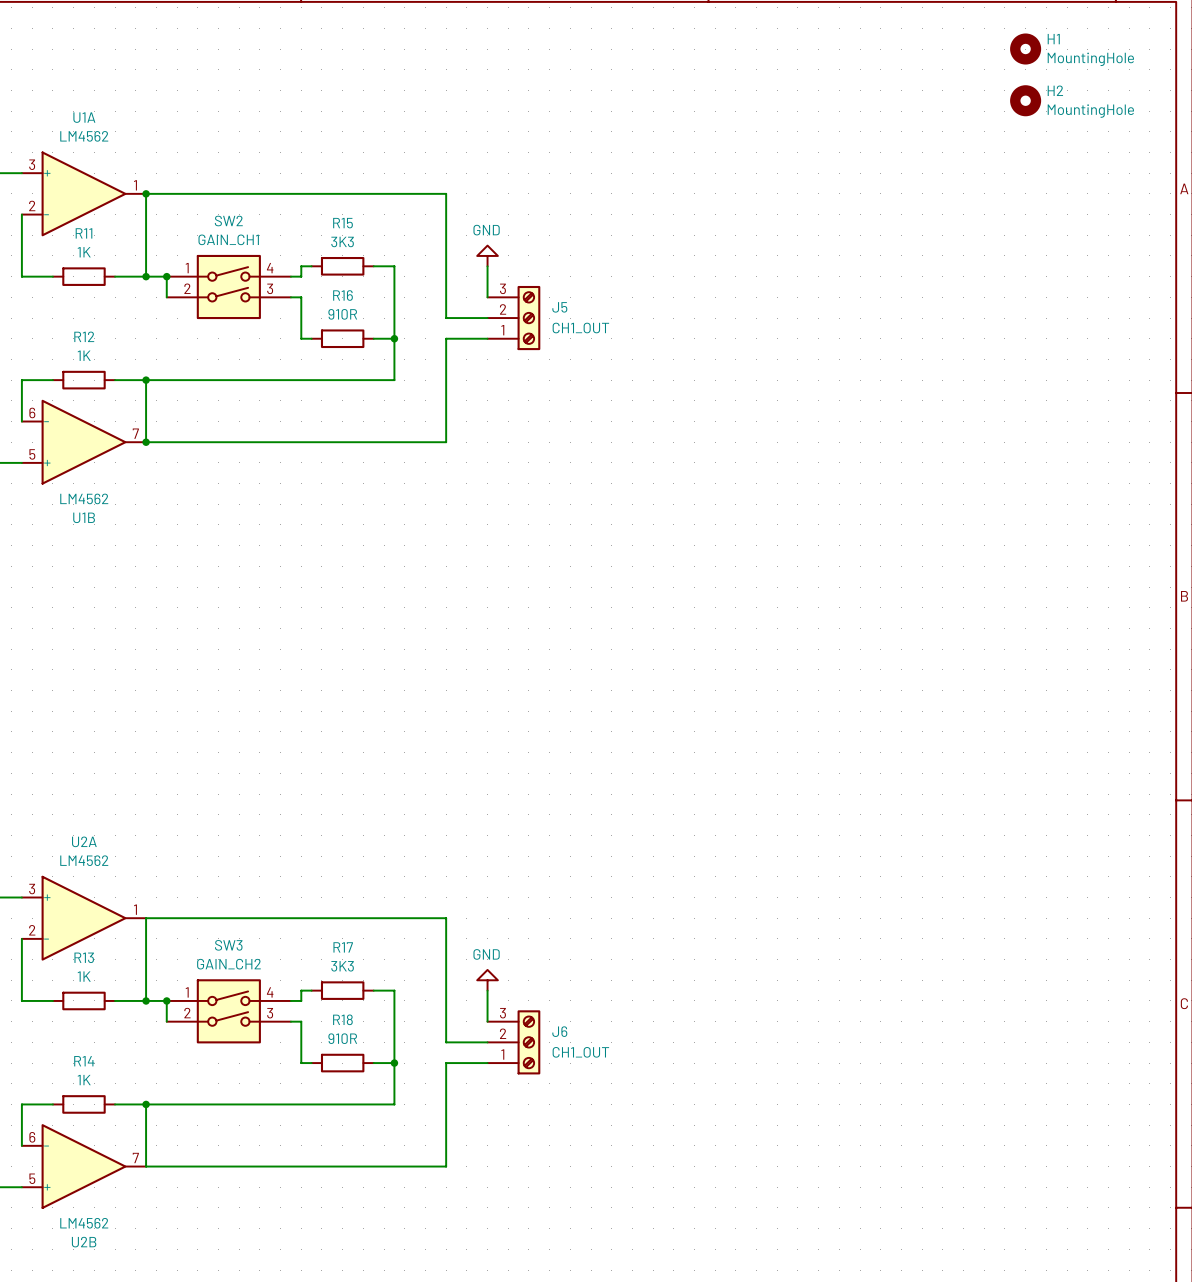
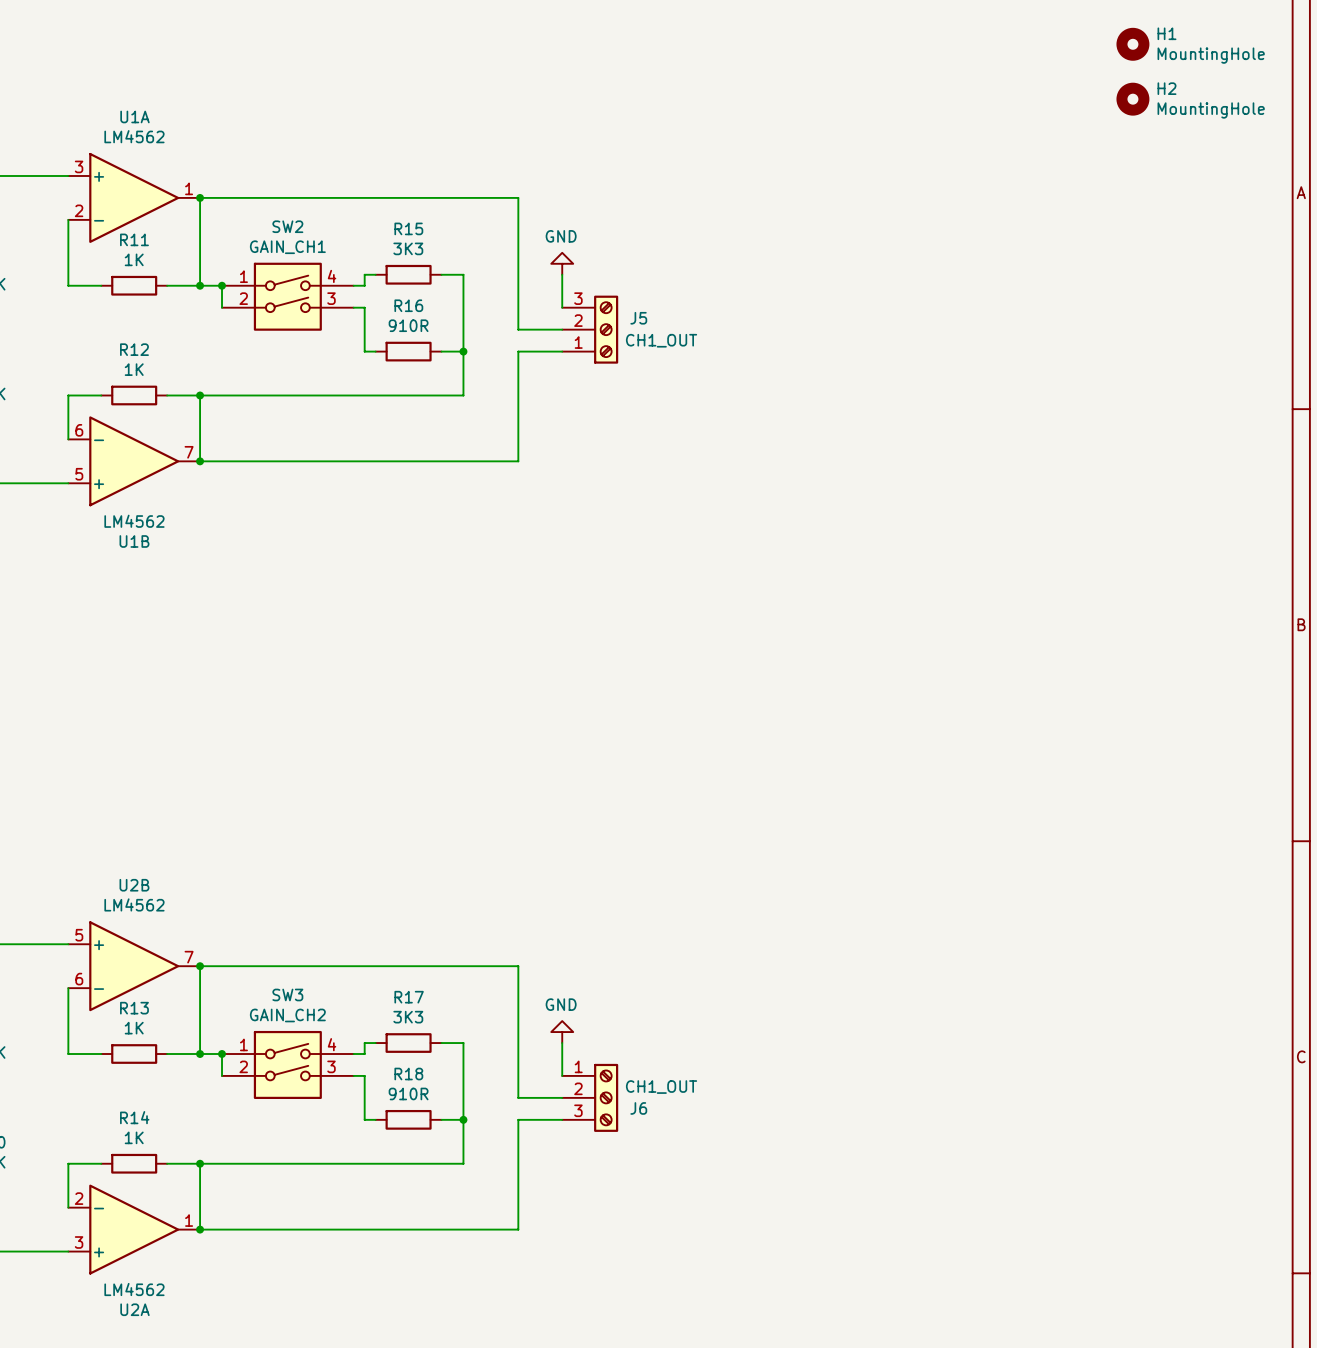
U2A flip: as is (83, 918) -> up-down (134, 1229)
U2A position: (83, 918) -> (134, 1229)
junction: none -> (200, 966)
J6 flip: as is (528, 1042) -> up-down (606, 1097)
U2B flip: as is (83, 1166) -> up-down (134, 966)
U2B position: (83, 1166) -> (134, 966)
junction: none -> (200, 1229)

